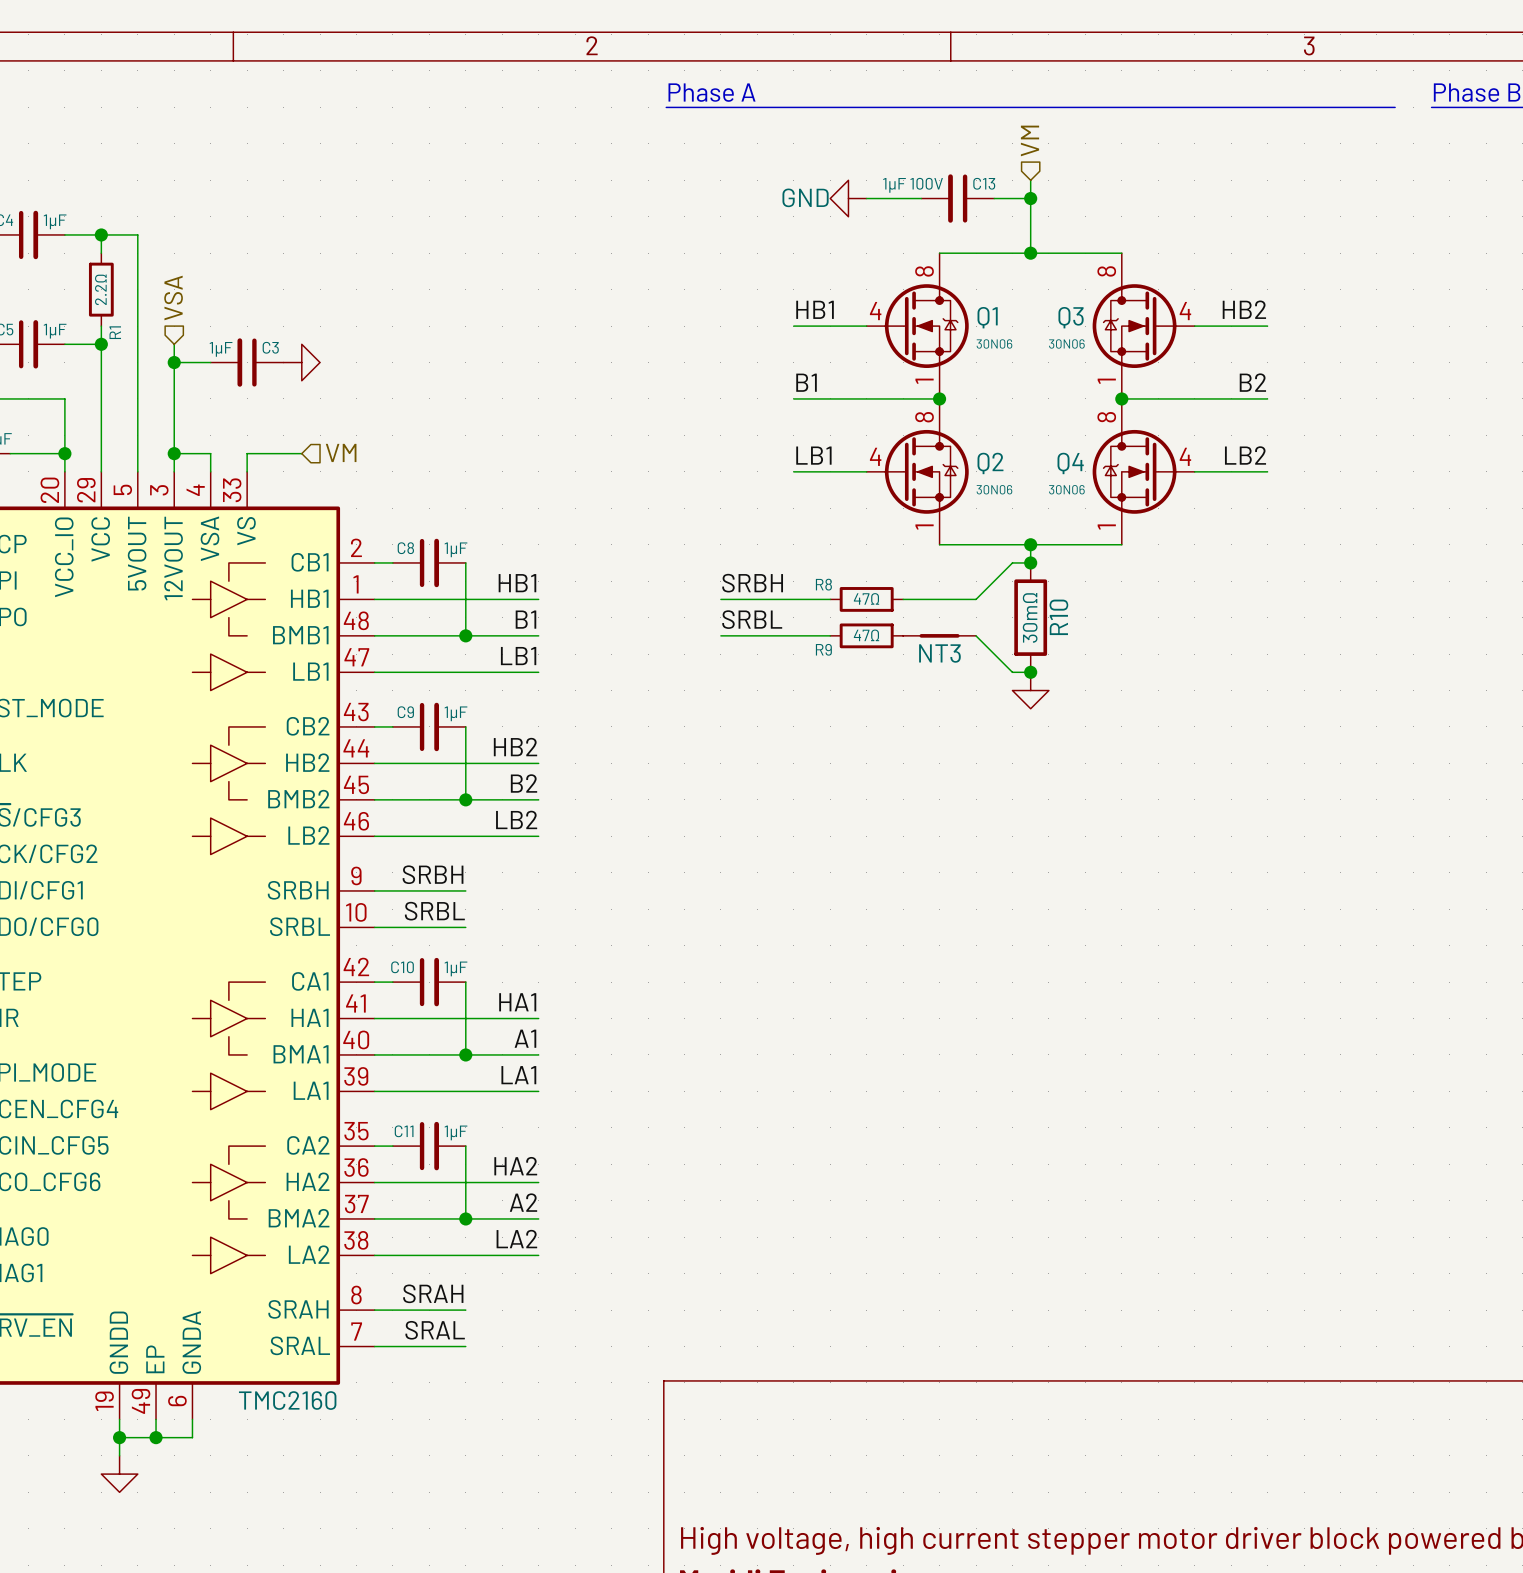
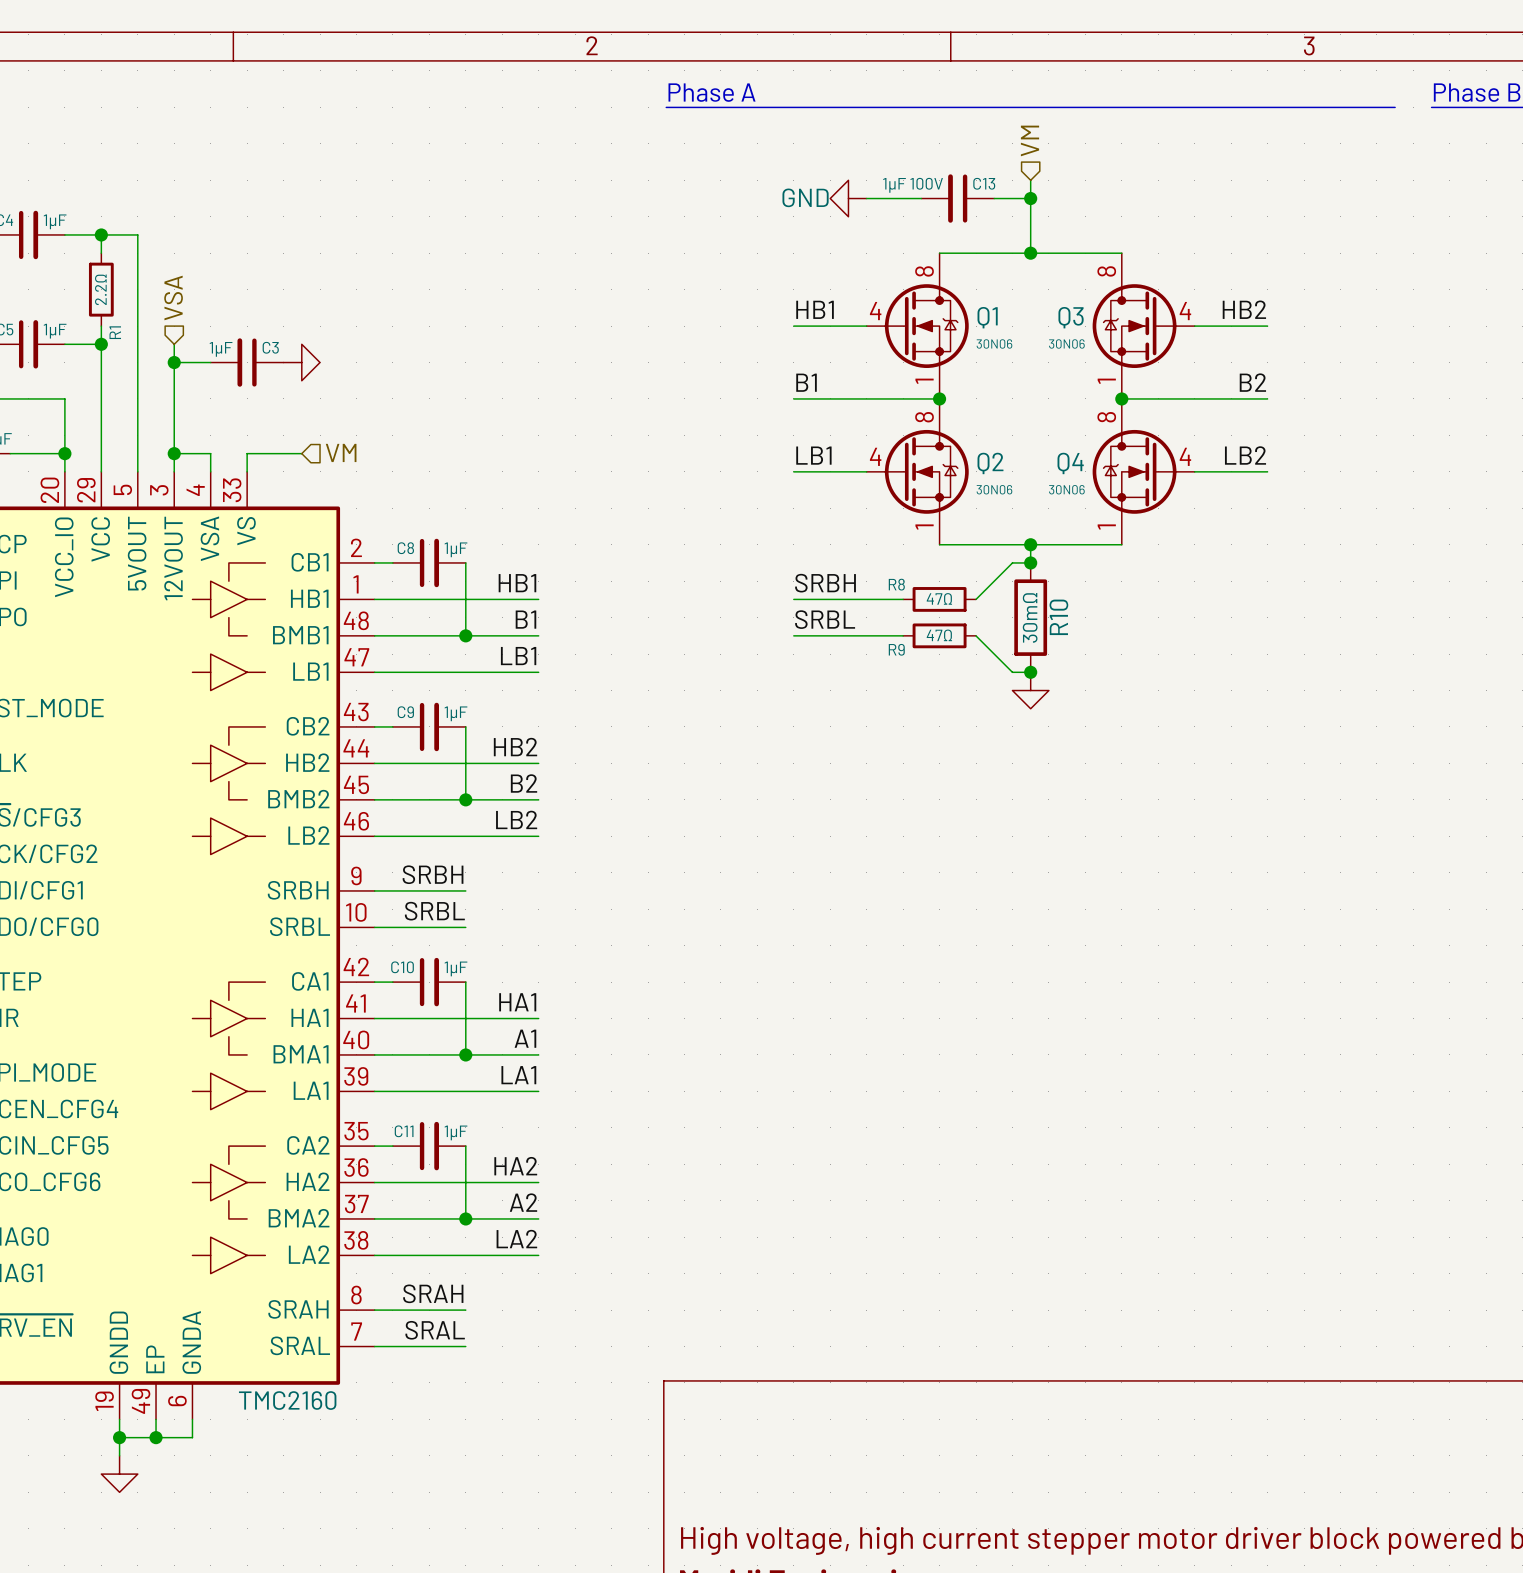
label position: SRBH (752, 583) -> SRBH (825, 583)
wire: (720, 599) (793, 599) -> none
R8 position: (866, 599) -> (939, 599)
wire: (903, 599) (976, 599) -> (903, 599) (830, 599)
label position: SRBL (752, 619) -> SRBL (825, 619)
wire: (720, 635) (793, 635) -> (830, 635) (903, 635)
R9 position: (866, 635) -> (939, 635)
NT3: (939, 635) -> none

